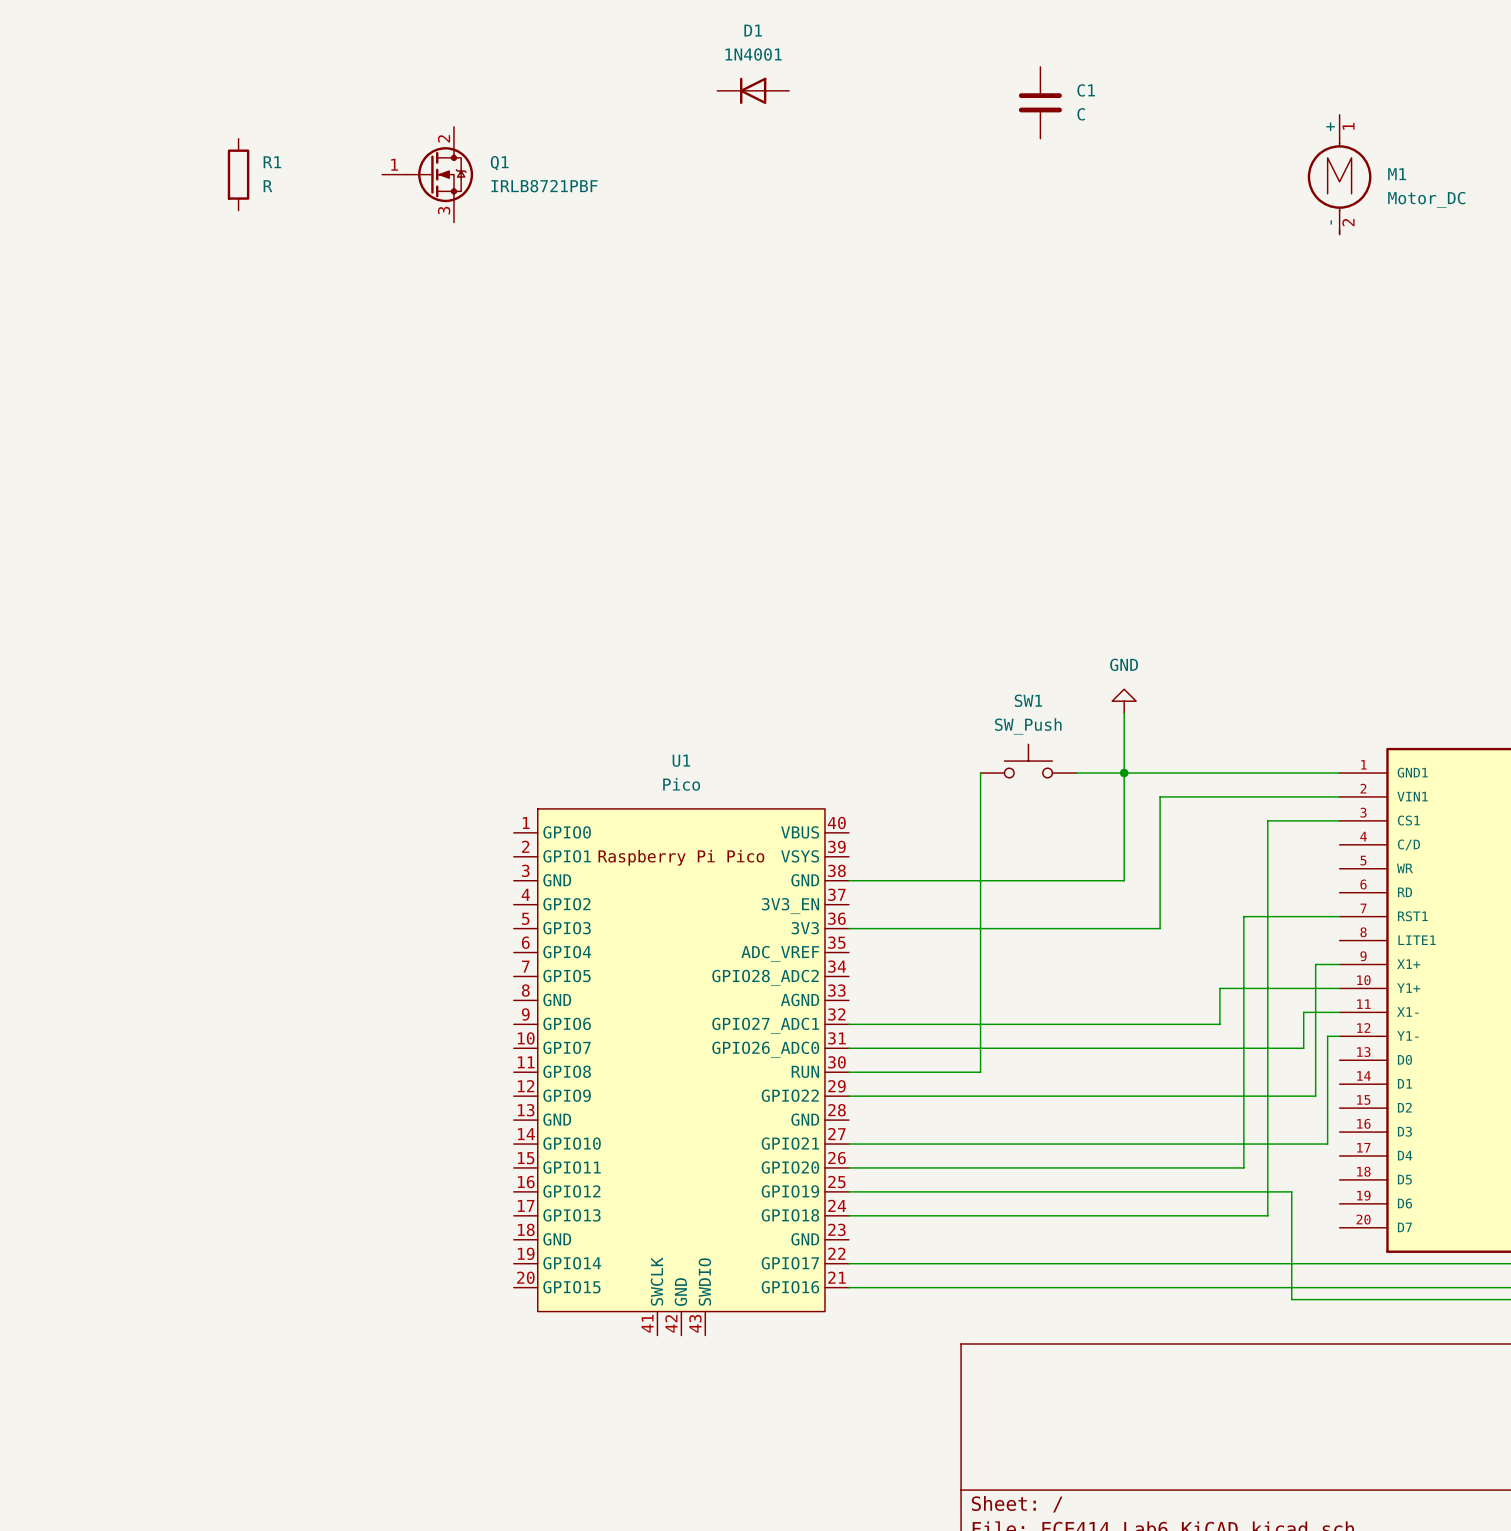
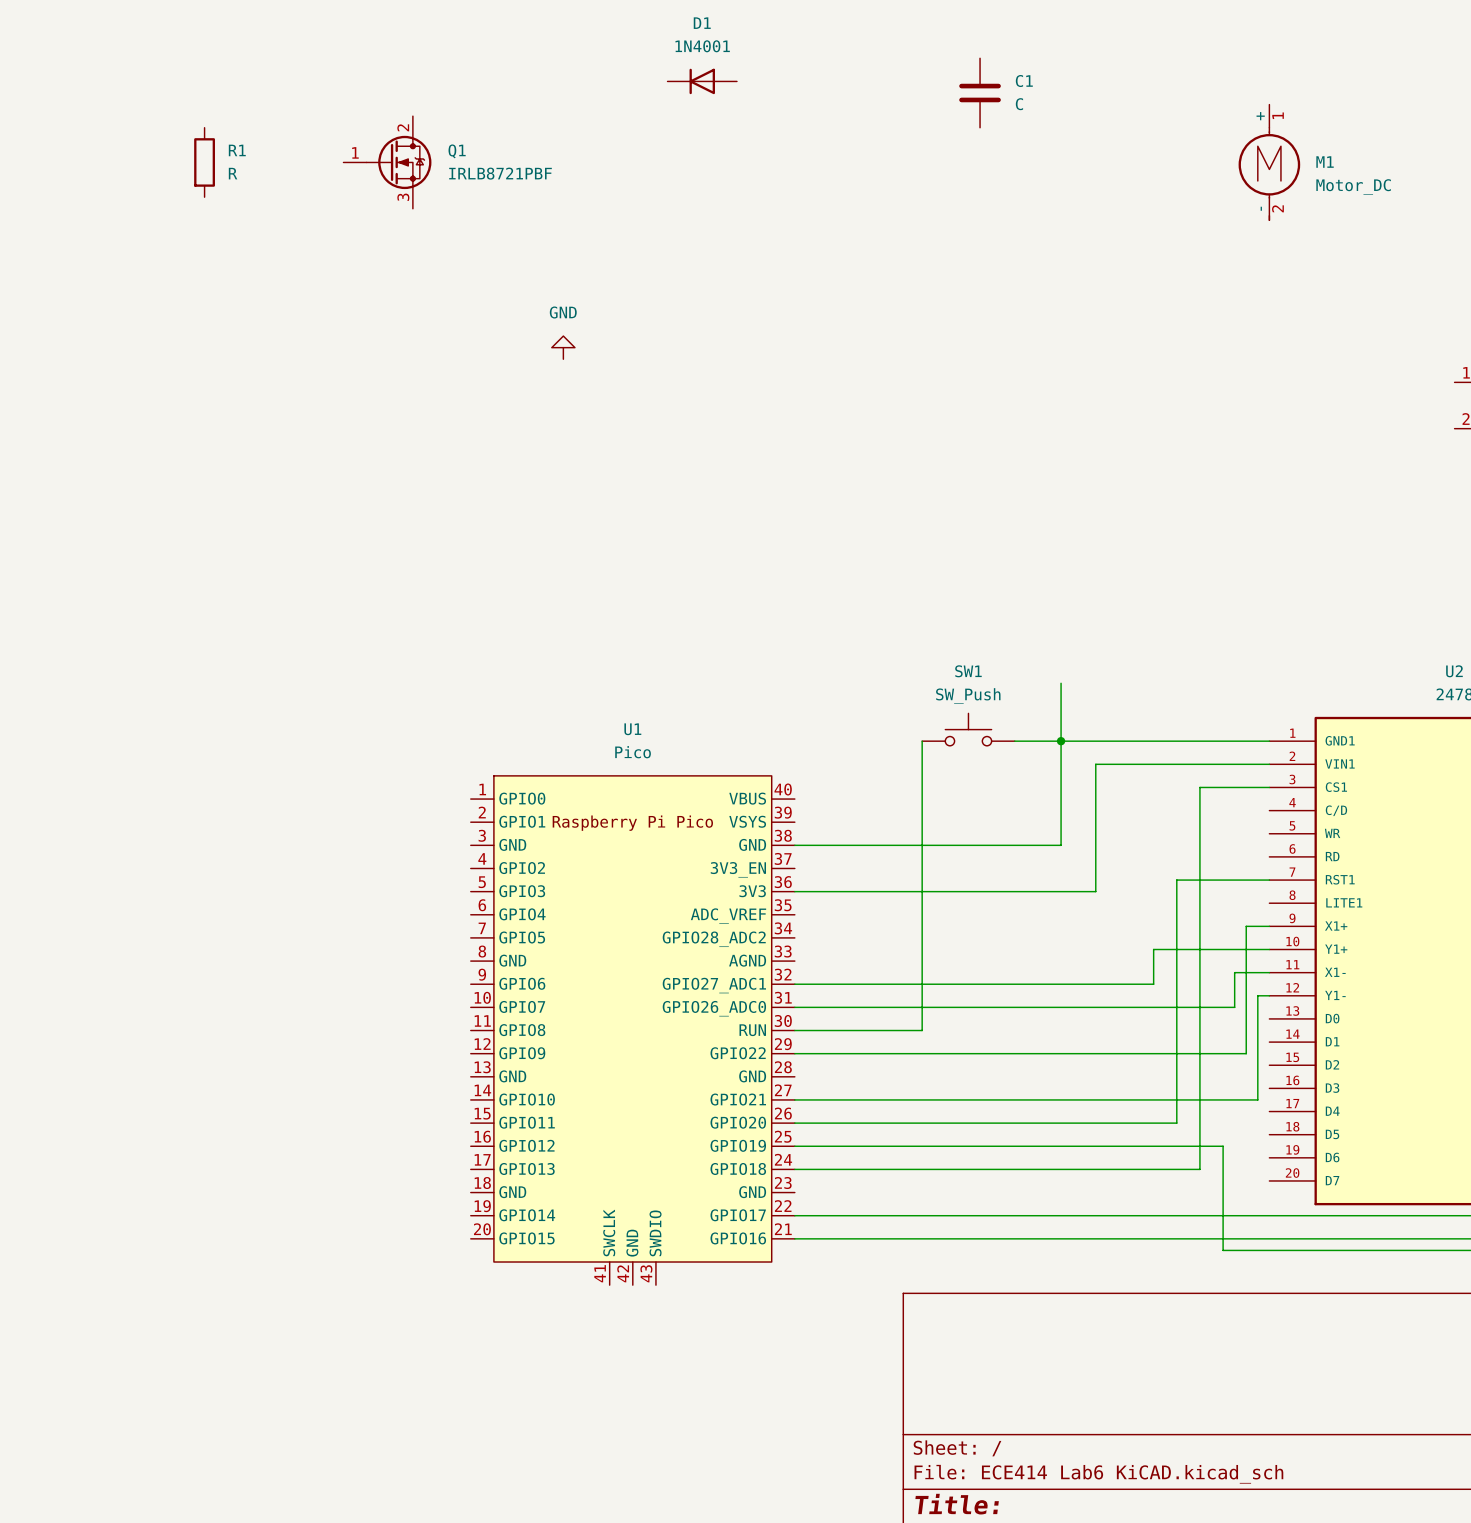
power symbol: none -> GND (563, 347)
power symbol: GND (1124, 701) -> none

